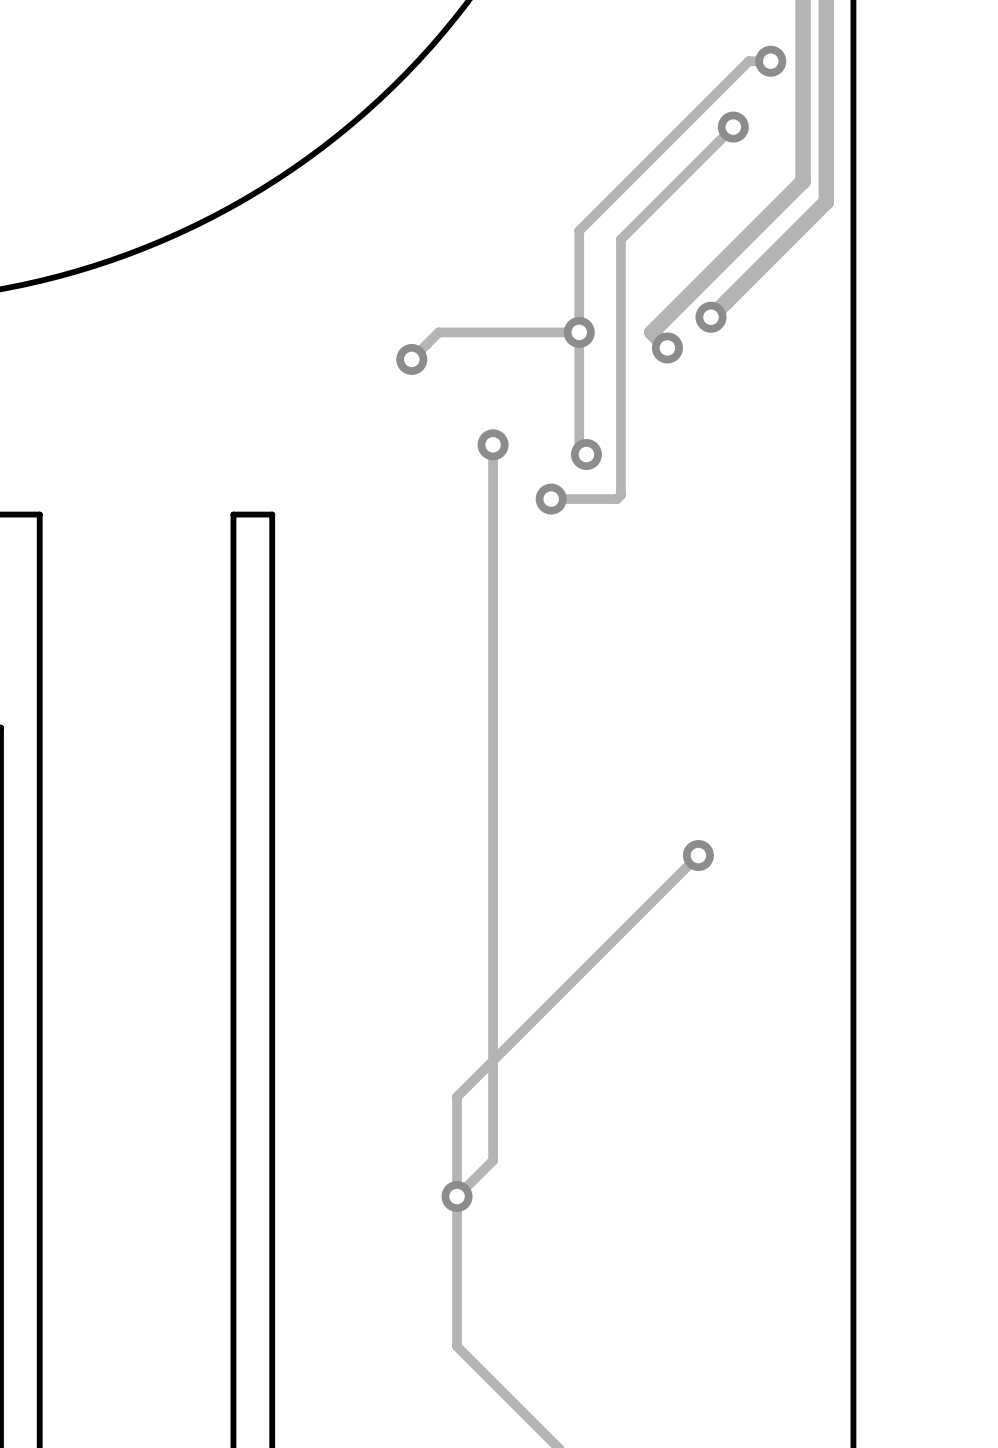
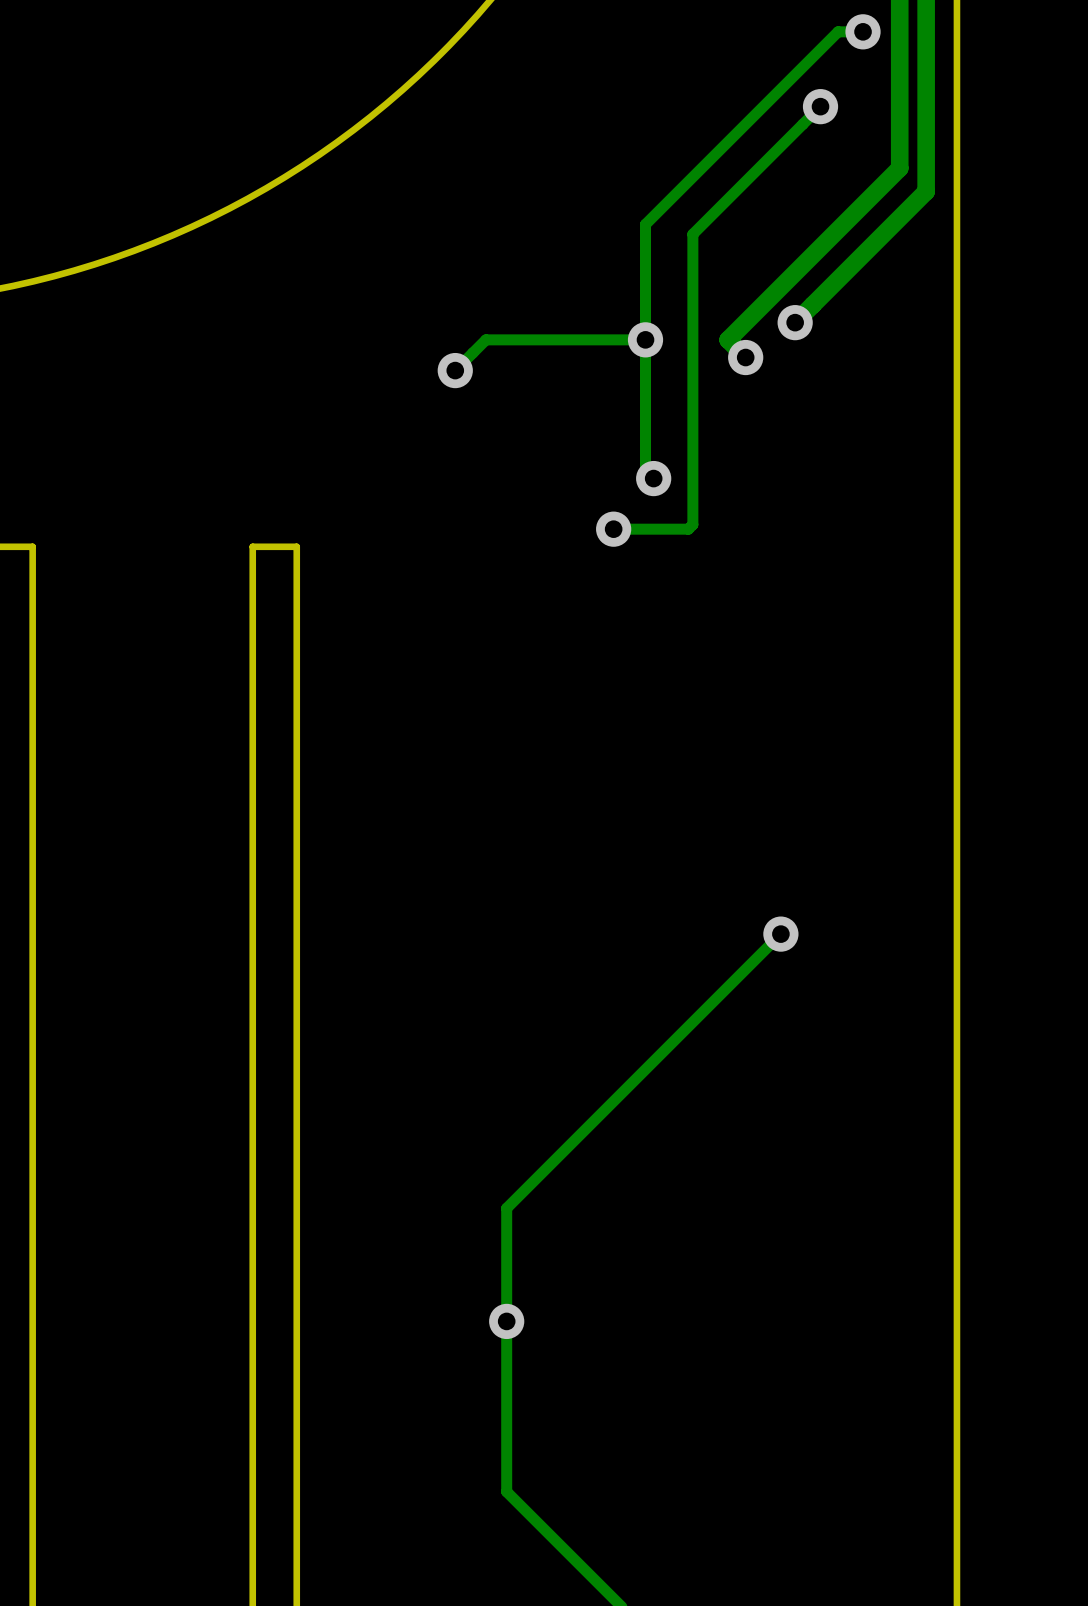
track: (493, 444) (493, 1160) (457, 1196) -> none
via: (493, 444) -> none

